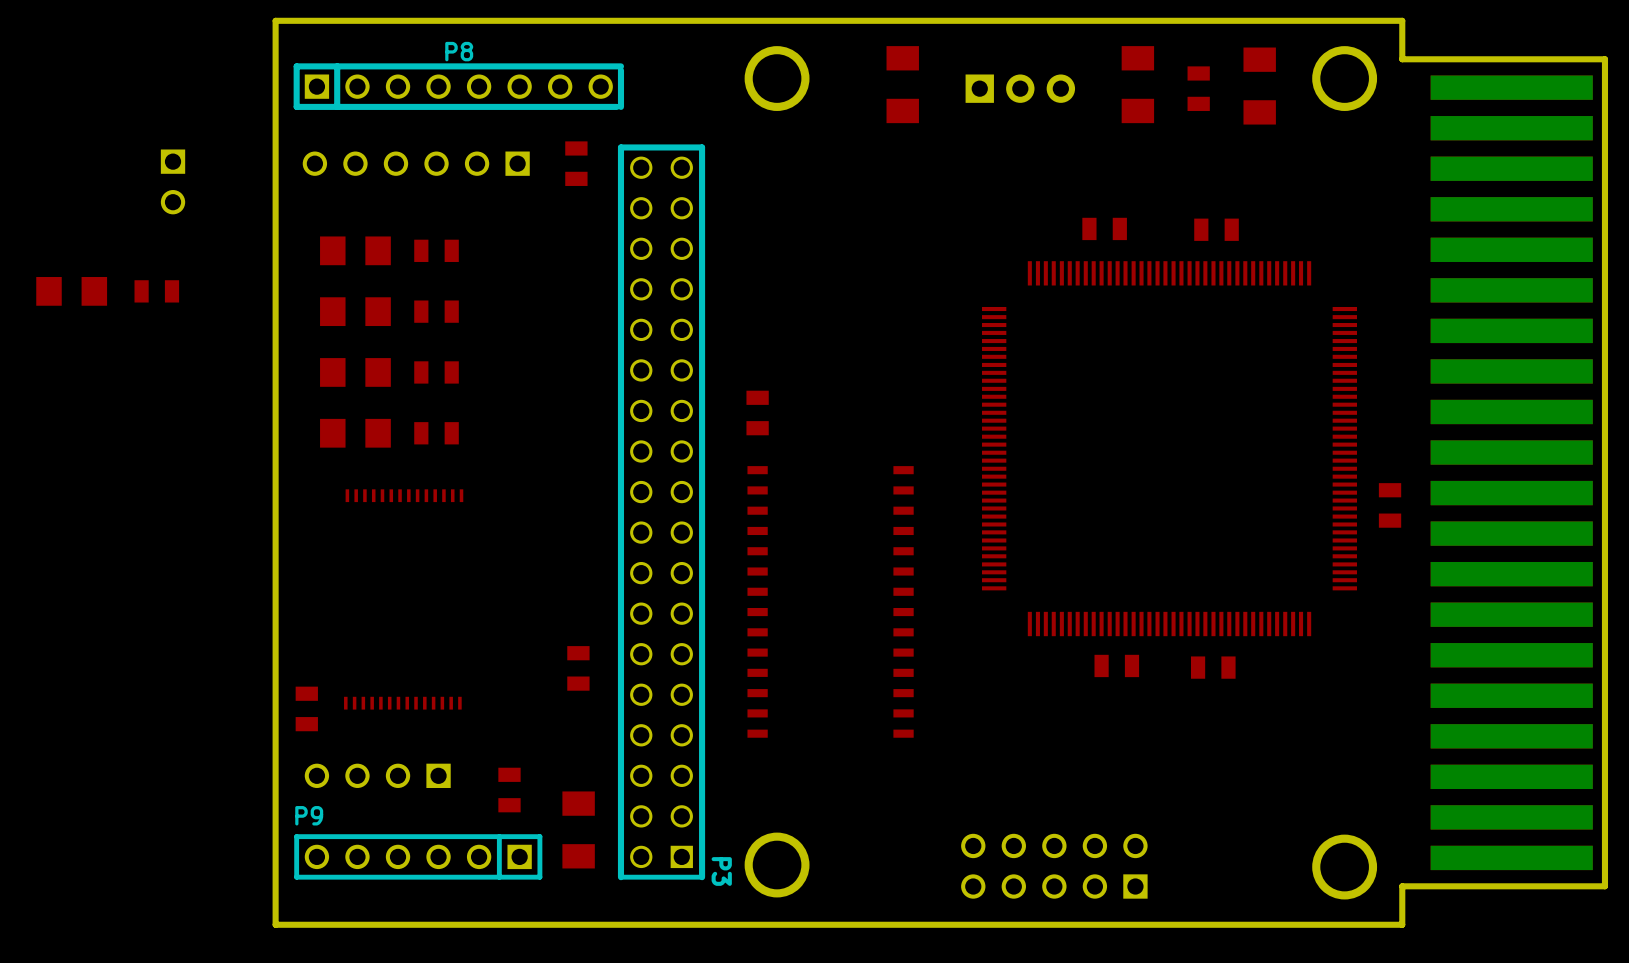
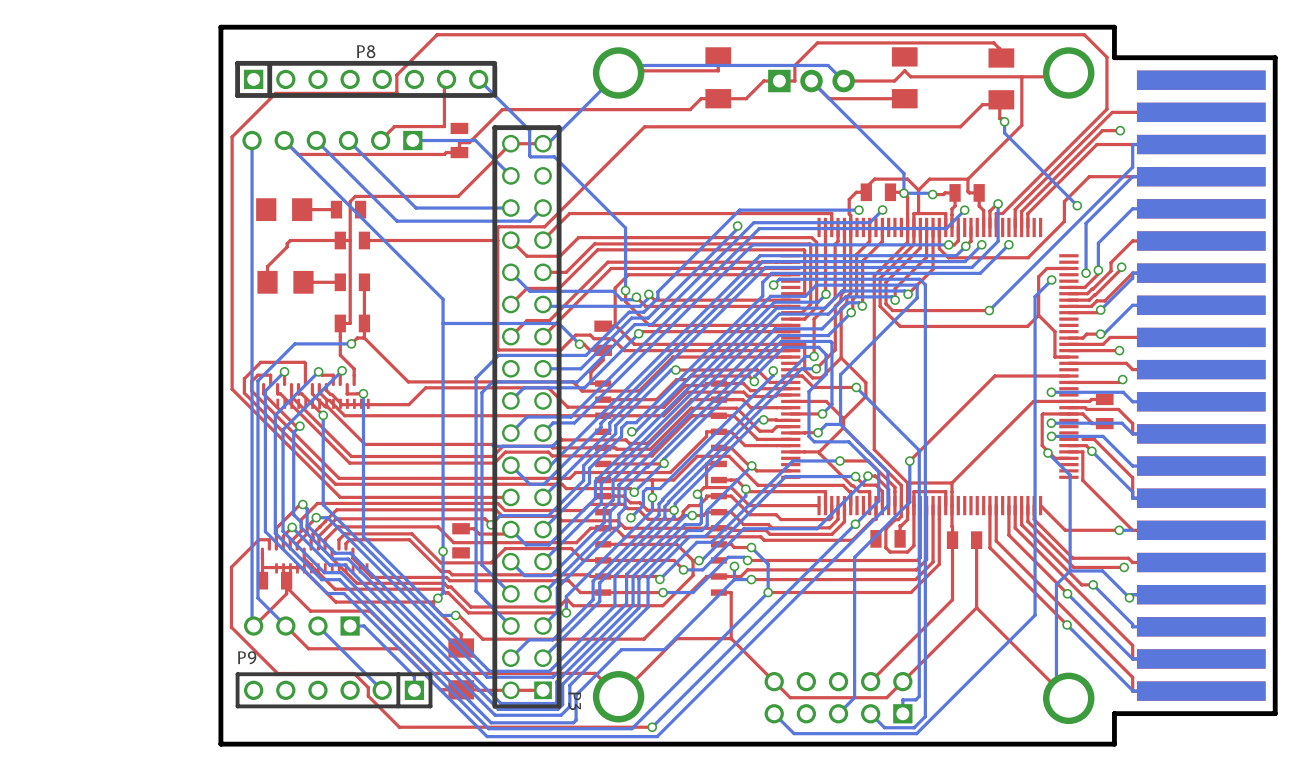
top track: none -> (718, 56) (718, 70) (620, 70) (618, 72)
top track: none -> (999, 62) (999, 48) (993, 42) (817, 42) (794, 65) (794, 81) (763, 81) (746, 98) (701, 98) (690, 109) (502, 109) (469, 142) (459, 142) (459, 152) (446, 152) (444, 154) (298, 154) (284, 140)
top track: none -> (1068, 72) (1064, 76) (910, 76) (904, 70) (894, 81) (843, 81)
top track: none -> (1021, 76) (1021, 125) (967, 179)
top track: none -> (446, 79) (444, 81) (444, 126) (394, 126) (380, 140)
bottom track: none -> (478, 79) (529, 130) (529, 155) (554, 156) (625, 227) (625, 290)
top track: none -> (811, 81) (829, 98) (904, 98)
bottom track: none -> (811, 81) (903, 173) (903, 193) (932, 194)
bottom track: none -> (843, 81) (828, 65) (626, 65) (547, 143) (543, 143)
part: (1198, 88) -> none
top track: none -> (1201, 112) (1112, 112) (1015, 209) (1015, 227)
top track: none -> (1004, 121) (999, 118) (999, 104) (982, 104) (960, 126) (644, 126) (544, 226) (497, 227) (498, 350) (560, 350) (575, 335) (590, 335) (594, 338) (612, 338) (624, 350) (790, 350)
bottom track: none -> (1004, 121) (1004, 133) (1077, 205)
via: none -> (1004, 121)
top track: none -> (1120, 130) (1102, 130) (1021, 211) (1021, 227)
via: none -> (1120, 130)
bottom track: none -> (252, 140) (252, 624) (253, 626)
bottom track: none -> (284, 140) (443, 299) (443, 593) (437, 598)
bottom track: none -> (316, 140) (396, 221) (529, 221) (543, 208)
bottom track: none -> (348, 140) (416, 208) (510, 208)
bottom track: none -> (412, 140) (475, 140) (510, 175)
top track: none -> (543, 143) (510, 143) (458, 196) (355, 196) (350, 201) (350, 323) (340, 323) (340, 355) (354, 369) (354, 384)
top track: none -> (1201, 144) (1096, 144) (1027, 213) (1027, 227)
bottom track: none -> (1201, 144) (1132, 144) (1132, 167) (989, 310)
part: (173, 181) -> none
top track: none -> (1201, 176) (1089, 176) (1064, 201) (1064, 221) (1028, 257) (948, 257) (939, 248) (939, 227)
bottom track: none -> (1201, 176) (1132, 176) (1086, 223) (1086, 273)
top track: none -> (967, 179) (967, 191) (979, 192) (979, 206) (983, 210) (983, 227)
top track: none -> (967, 179) (929, 179) (918, 190)
top track: none -> (918, 190) (907, 179) (874, 179) (861, 192)
top track: none -> (918, 190) (918, 213)
top track: none -> (866, 192) (856, 192) (849, 199) (850, 293) (846, 297) (846, 302) (841, 308) (841, 357)
top track: none -> (890, 192) (900, 192) (907, 196) (907, 242) (874, 275) (874, 449) (907, 482)
via: none -> (903, 193)
top track: none -> (932, 194) (955, 192) (955, 206) (952, 209) (952, 227)
via: none -> (932, 194)
top track: none -> (998, 203) (989, 211) (989, 227)
bottom track: none -> (998, 203) (998, 241) (972, 267) (765, 267) (609, 423) (609, 430) (543, 497)
via: none -> (998, 203)
via: none -> (1077, 205)
bottom track: none -> (1201, 208) (1132, 208) (1098, 243) (1098, 270)
top track: none -> (340, 209) (303, 209)
bottom track: none -> (858, 210) (739, 210) (657, 291) (657, 298) (643, 312) (629, 312) (585, 355) (498, 355) (476, 377) (476, 591) (510, 626)
via: none -> (858, 210)
bottom track: none -> (882, 209) (869, 222) (753, 222) (652, 324) (634, 324) (577, 381) (492, 381) (481, 392) (481, 564) (510, 593)
via: none -> (882, 209)
bottom track: none -> (964, 210) (946, 228) (759, 228) (570, 417) (526, 417) (510, 433)
via: none -> (964, 210)
bottom track: none -> (737, 226) (737, 228) (648, 318) (631, 318) (580, 368) (543, 368)
via: none -> (737, 226)
top track: none -> (825, 227) (826, 294)
top track: none -> (831, 227) (831, 213) (569, 213) (543, 240)
top track: none -> (838, 227) (838, 241) (835, 244) (835, 298) (814, 319) (814, 356)
top track: none -> (844, 227) (844, 291) (841, 294) (841, 300) (835, 306) (835, 349) (816, 368)
top track: none -> (869, 227) (869, 241) (856, 254) (856, 295) (852, 299) (851, 312)
top track: none -> (882, 227) (882, 241) (862, 261) (862, 306)
top track: none -> (920, 227) (920, 247) (886, 282) (886, 303) (892, 310) (989, 310)
top track: none -> (926, 227) (926, 257) (895, 288) (895, 300)
top track: none -> (933, 227) (933, 269) (908, 294)
top track: none -> (945, 227) (945, 213) (913, 213) (913, 244) (880, 278) (880, 306) (900, 326) (1027, 326) (1038, 315)
top track: none -> (958, 227) (958, 240) (954, 244) (948, 244)
top track: none -> (970, 227) (970, 241) (965, 246)
top track: none -> (996, 227) (996, 213) (1002, 213) (1106, 109) (1106, 57) (1084, 34) (437, 34) (396, 75) (395, 93) (275, 93) (232, 136) (232, 389) (340, 497) (510, 497)
top track: none -> (350, 240) (290, 240) (287, 246) (267, 266) (267, 282)
part: none -> (352, 240)
top track: none -> (497, 240) (364, 240)
top track: none -> (510, 240) (526, 256) (559, 256) (578, 237) (811, 237) (816, 242) (816, 307) (804, 319) (790, 319)
top track: none -> (1201, 240) (1132, 240) (1111, 262) (1111, 270) (1087, 293) (1068, 293)
part: (71, 291) -> none
part: (156, 291) -> none
bottom track: none -> (948, 244) (752, 244) (574, 422) (553, 422) (543, 433)
via: none -> (948, 244)
bottom track: none -> (981, 244) (965, 261) (762, 261) (600, 423) (600, 427) (544, 484) (529, 484) (510, 465)
via: none -> (981, 244)
bottom track: none -> (1008, 244) (980, 273) (771, 273) (762, 282) (762, 296) (636, 422) (626, 422) (621, 428) (621, 436) (589, 468) (589, 483) (543, 529)
via: none -> (1008, 244)
bottom track: none -> (965, 246) (956, 255) (760, 255) (550, 465) (543, 465)
via: none -> (965, 246)
part: (355, 311) -> none
part: (436, 311) -> none
top track: none -> (790, 262) (607, 262) (549, 320) (526, 320) (510, 336)
top track: none -> (1121, 267) (1089, 300) (1068, 300)
via: none -> (1121, 267)
top track: none -> (790, 268) (611, 268) (543, 336)
top track: none -> (1068, 268) (1046, 268) (1038, 276) (1038, 315)
top track: none -> (1098, 270) (1098, 273) (1084, 287) (1068, 287)
via: none -> (1098, 270)
bottom track: none -> (510, 272) (529, 291) (613, 291) (621, 299) (633, 299) (636, 297)
top track: none -> (543, 272) (566, 272) (594, 243) (809, 243) (810, 304) (802, 312) (790, 312)
via: none -> (1086, 273)
top track: none -> (1201, 273) (1132, 273) (1104, 300) (1096, 300) (1091, 306) (1068, 306)
bottom track: none -> (1201, 273) (1132, 273) (1132, 278) (1100, 310)
top track: none -> (790, 274) (628, 274) (615, 288) (615, 326)
bottom track: none -> (1051, 280) (1035, 296) (1035, 615) (916, 733) (794, 733) (774, 713)
via: none -> (1051, 280)
part: none -> (285, 282)
top track: none -> (340, 282) (303, 282)
part: none -> (352, 282)
top track: none -> (364, 282) (364, 338)
bottom track: none -> (773, 285) (779, 279) (919, 279) (925, 284) (925, 716) (914, 727) (884, 727) (870, 713)
via: none -> (773, 285)
top track: none -> (625, 290) (625, 301) (649, 325) (790, 325)
via: none -> (625, 290)
top track: none -> (790, 293) (804, 293) (803, 249) (597, 249) (559, 288) (526, 288) (510, 304)
top track: none -> (648, 294) (654, 300) (790, 300)
bottom track: none -> (648, 294) (648, 297) (640, 306) (544, 306) (543, 304)
via: none -> (648, 294)
bottom track: none -> (826, 294) (818, 302) (774, 302) (595, 481) (595, 498) (548, 544) (526, 544) (510, 529)
via: none -> (826, 294)
bottom track: none -> (908, 294) (904, 291) (842, 291) (824, 308) (776, 308) (601, 483) (601, 503) (543, 561)
via: none -> (908, 294)
top track: none -> (636, 297) (645, 306) (790, 306)
via: none -> (636, 297)
bottom track: none -> (895, 300) (891, 296) (845, 296) (828, 314) (779, 314) (613, 480) (613, 500) (604, 508) (604, 522) (551, 575) (524, 575) (510, 561)
via: none -> (895, 300)
bottom track: none -> (1201, 305) (1132, 305) (1103, 334) (1100, 334)
part: (355, 372) -> none
part: (436, 372) -> none
bottom track: none -> (862, 306) (859, 302) (848, 302) (822, 328) (775, 328) (618, 485) (618, 503) (610, 511) (610, 526) (543, 593)
via: none -> (862, 306)
top track: none -> (1100, 310) (1098, 312) (1068, 312)
via: none -> (1100, 310)
via: none -> (989, 310)
bottom track: none -> (851, 312) (828, 335) (779, 335) (647, 466)
via: none -> (851, 312)
top track: none -> (1038, 315) (1054, 331) (1054, 357) (1068, 357)
part: none -> (352, 323)
bottom track: none -> (443, 323) (558, 323) (579, 344)
top track: none -> (603, 326) (616, 326) (634, 344) (804, 344) (804, 370) (812, 377) (821, 377) (841, 357)
top track: none -> (790, 331) (640, 331) (638, 333)
bottom track: none -> (638, 333) (584, 387) (524, 387) (510, 400)
via: none -> (638, 333)
top track: none -> (1100, 334) (1086, 334) (1082, 338) (1068, 338)
via: none -> (1100, 334)
top track: none -> (1201, 337) (1110, 337) (1103, 344) (1068, 344)
top track: none -> (364, 338) (357, 338) (351, 343)
top track: none -> (364, 338) (408, 381) (573, 381) (582, 391) (639, 391) (673, 357) (790, 357)
bottom track: none -> (351, 343) (294, 343) (257, 380) (257, 598) (285, 626)
via: none -> (351, 343)
top track: none -> (579, 344) (583, 344) (590, 350) (603, 350) (603, 360) (590, 372) (590, 383) (603, 383)
via: none -> (579, 344)
top track: none -> (1119, 350) (1068, 350)
via: none -> (1119, 350)
part: (355, 433) -> none
part: (436, 433) -> none
bottom track: none -> (814, 356) (805, 356) (662, 499) (659, 504) (659, 515) (593, 581) (593, 599) (552, 639) (529, 639) (510, 658)
via: none -> (814, 356)
top track: none -> (841, 357) (865, 382) (865, 396) (843, 418)
top track: none -> (1068, 363) (1126, 363) (1132, 369) (1201, 369)
bottom track: none -> (816, 368) (801, 368) (668, 501) (664, 506) (664, 517) (599, 582) (599, 601) (543, 658)
via: none -> (816, 368)
top track: none -> (342, 370) (340, 372) (340, 384)
bottom track: none -> (342, 370) (283, 429) (283, 531) (324, 572) (341, 572) (491, 722) (573, 722) (576, 720) (576, 695) (621, 649) (664, 649) (734, 579)
via: none -> (342, 370)
top track: none -> (675, 370) (757, 370) (769, 382) (790, 382)
bottom track: none -> (675, 370) (671, 370) (615, 425) (615, 433) (583, 465) (583, 480) (548, 515) (500, 515) (491, 524)
via: none -> (675, 370)
bottom track: none -> (773, 370) (773, 375) (660, 488) (646, 488) (643, 492) (643, 505) (630, 517)
via: none -> (773, 370)
top track: none -> (284, 371) (284, 384)
bottom track: none -> (284, 371) (265, 390) (265, 531) (327, 593) (344, 593) (487, 736) (657, 736) (887, 505) (887, 471) (840, 424)
via: none -> (284, 371)
top track: none -> (318, 371) (321, 375) (333, 375) (333, 384)
bottom track: none -> (318, 371) (275, 415) (275, 533) (321, 579) (339, 579) (488, 728) (631, 728) (768, 592) (768, 564) (751, 547)
via: none -> (318, 371)
top track: none -> (790, 376) (802, 376) (813, 387) (856, 387)
top track: none -> (1068, 376) (994, 376) (909, 461)
top track: none -> (1122, 379) (1119, 382) (1068, 382)
via: none -> (1122, 379)
top track: none -> (754, 381) (748, 376) (690, 376) (687, 379) (676, 379) (656, 399) (603, 399)
bottom track: none -> (754, 381) (754, 376) (783, 347) (818, 347) (826, 354) (826, 374) (809, 391) (809, 436) (814, 441) (848, 441) (878, 471) (878, 500) (855, 524)
via: none -> (754, 381)
top track: none -> (263, 384) (263, 393) (295, 426) (299, 426)
top track: none -> (270, 384) (270, 375) (257, 375) (251, 381) (251, 390) (339, 478) (569, 478) (575, 472) (670, 472) (706, 436) (706, 431) (731, 431) (745, 445) (790, 445)
top track: none -> (277, 384) (277, 393) (280, 393) (349, 463) (494, 463) (505, 452) (548, 452) (552, 455) (651, 455) (692, 415) (733, 415) (757, 439) (790, 439)
top track: none -> (291, 384) (291, 396) (351, 456) (492, 456) (503, 446) (650, 449) (691, 408) (736, 408) (759, 431) (772, 431) (776, 426) (790, 426)
top track: none -> (298, 384) (298, 393) (301, 393) (323, 415)
top track: none -> (305, 384) (304, 362) (260, 362) (244, 378) (244, 393) (335, 484) (561, 484) (566, 488) (630, 488) (634, 492)
top track: none -> (312, 384) (312, 393) (365, 444) (491, 444)
top track: none -> (319, 384) (319, 392) (344, 415) (663, 415) (687, 392) (743, 392) (748, 396) (790, 394)
top track: none -> (326, 384) (326, 390) (342, 404) (408, 404) (425, 387) (548, 387) (567, 407) (663, 407) (685, 385) (704, 385) (706, 383) (743, 383) (750, 390) (790, 388)
top track: none -> (347, 384) (347, 393) (363, 393)
bottom track: none -> (856, 387) (919, 450) (919, 696) (915, 699) (902, 699) (902, 713)
via: none -> (856, 387)
bottom track: none -> (1051, 392) (1123, 392) (1132, 401) (1201, 401)
via: none -> (1051, 392)
bottom track: none -> (363, 393) (363, 536) (442, 615) (455, 615)
via: none -> (363, 393)
top track: none -> (1104, 399) (1091, 399) (1089, 401) (1033, 401) (952, 482)
top track: none -> (790, 401) (826, 401) (843, 418)
top track: none -> (790, 407) (750, 407) (742, 399) (691, 399) (647, 443) (629, 443) (625, 439) (560, 438)
top track: none -> (1068, 407) (1118, 409) (1132, 423) (1132, 433) (1201, 433)
top track: none -> (822, 413) (790, 413)
bottom track: none -> (822, 413) (831, 404) (831, 342) (781, 341) (663, 459) (663, 462)
via: none -> (822, 413)
bottom track: none -> (323, 415) (323, 504) (489, 671) (549, 671) (614, 605) (614, 576) (674, 516) (675, 503) (758, 419) (763, 419)
via: none -> (323, 415)
top track: none -> (843, 418) (843, 427)
top track: none -> (763, 419) (790, 420)
via: none -> (763, 419)
bottom track: none -> (1051, 423) (1121, 423) (1132, 433) (1201, 433)
via: none -> (1051, 423)
top track: none -> (1104, 423) (1091, 423) (1082, 413) (1043, 413) (1042, 445) (1054, 458) (1068, 458)
bottom track: none -> (840, 424) (840, 374) (917, 298) (916, 285) (816, 285) (805, 296) (770, 296) (635, 431) (631, 431)
bottom track: none -> (840, 424) (826, 424) (818, 432)
bottom track: none -> (299, 426) (293, 432) (293, 514) (301, 522) (301, 527) (332, 559) (348, 559) (498, 709) (557, 709) (562, 704) (562, 684) (638, 607) (638, 578) (687, 530) (701, 530) (707, 525) (707, 510) (751, 465)
via: none -> (299, 426)
top track: none -> (843, 427) (901, 485) (901, 516) (885, 528) (885, 547) (890, 552) (907, 552) (913, 545) (913, 491) (945, 491) (945, 505)
top track: none -> (843, 427) (819, 451)
via: none -> (631, 431)
top track: none -> (818, 432) (790, 432)
via: none -> (818, 432)
bottom track: none -> (1051, 436) (1103, 436) (1132, 466) (1201, 466)
via: none -> (1051, 436)
bottom track: none -> (560, 438) (552, 446) (493, 446) (491, 444)
top track: none -> (1082, 439) (1094, 439) (1132, 477) (1132, 498) (1201, 498)
top track: none -> (1068, 445) (1086, 445) (1091, 451)
top track: none -> (718, 447) (731, 447) (756, 470) (790, 470)
bottom track: none -> (1091, 451) (1132, 492) (1132, 498) (1201, 498)
via: none -> (1091, 451)
top track: none -> (819, 451) (859, 491) (869, 491) (869, 505)
top track: none -> (819, 451) (790, 451)
top track: none -> (1068, 451) (1082, 451) (1082, 480) (1132, 530) (1201, 530)
bottom track: none -> (1047, 453) (1070, 475) (1070, 570)
via: none -> (1047, 453)
top track: none -> (839, 460) (868, 460) (894, 487) (894, 505)
bottom track: none -> (839, 460) (792, 460) (711, 542) (697, 542) (659, 579)
via: none -> (839, 460)
bottom track: none -> (909, 461) (909, 502) (854, 557) (854, 697) (838, 713)
via: none -> (909, 461)
bottom track: none -> (663, 462) (634, 492)
top track: none -> (664, 463) (603, 463)
via: none -> (664, 463)
top track: none -> (718, 463) (706, 463) (706, 487)
via: none -> (751, 465)
bottom track: none -> (647, 466) (625, 488) (625, 508) (618, 514) (618, 526) (557, 588) (557, 611) (543, 626)
top track: none -> (867, 476) (875, 476) (888, 489) (888, 505)
bottom track: none -> (867, 476) (817, 528) (743, 528) (702, 569) (683, 569)
via: none -> (867, 476)
top track: none -> (855, 476) (864, 485) (876, 485) (882, 491) (882, 505)
bottom track: none -> (855, 476) (785, 476) (701, 560) (699, 560)
via: none -> (855, 476)
top track: none -> (603, 480) (673, 480) (697, 456) (728, 456) (758, 485) (843, 485) (850, 491) (850, 505)
top track: none -> (652, 480) (652, 497)
top track: none -> (718, 480) (736, 480) (748, 491) (825, 491) (825, 505)
top track: none -> (907, 482) (907, 519) (900, 525) (900, 538)
top track: none -> (952, 482) (952, 599) (870, 681)
top track: none -> (952, 482) (907, 482)
bottom track: none -> (745, 489) (745, 495) (705, 536) (689, 536) (648, 578) (648, 607) (569, 685) (569, 706) (561, 715) (495, 715) (344, 564) (329, 564) (292, 527)
via: none -> (745, 489)
via: none -> (634, 492)
top track: none -> (697, 494) (704, 487) (731, 487) (749, 505) (819, 505)
bottom track: none -> (697, 494) (701, 498) (701, 522) (699, 524) (684, 524) (633, 576) (633, 605) (556, 681) (555, 703) (500, 703) (350, 553) (335, 553) (307, 525) (307, 508) (302, 504)
via: none -> (697, 494)
top track: none -> (603, 496) (623, 496) (630, 502) (640, 502) (647, 510) (674, 510)
bottom track: none -> (652, 497) (652, 510) (566, 596) (566, 612)
via: none -> (652, 497)
top track: none -> (302, 504) (300, 504) (276, 528) (276, 549)
via: none -> (302, 504)
top track: none -> (831, 505) (831, 517) (829, 519) (780, 519) (776, 514) (749, 514) (731, 496) (706, 496) (698, 505) (689, 505) (678, 519) (648, 519) (637, 508) (627, 508) (623, 504) (589, 504) (583, 510) (504, 510) (497, 503) (317, 503) (301, 519) (301, 531) (290, 539) (290, 549)
top track: none -> (838, 505) (838, 519) (829, 527) (771, 527) (768, 524) (743, 524) (731, 512) (706, 512) (703, 515) (692, 515)
top track: none -> (844, 505) (844, 521) (831, 534) (769, 534) (766, 530) (733, 530) (731, 528) (625, 528) (617, 520) (561, 520) (557, 516) (502, 516) (495, 509) (336, 509) (325, 521)
top track: none -> (875, 505) (875, 519) (873, 519) (852, 540) (764, 540) (760, 536) (624, 536) (615, 528) (590, 528) (576, 542) (453, 542) (437, 526) (337, 526) (325, 539) (325, 549)
top track: none -> (920, 505) (920, 557) (917, 560) (747, 560)
top track: none -> (926, 505) (926, 559) (916, 569) (747, 569) (740, 576) (706, 576) (643, 639) (482, 639) (458, 615) (455, 615)
top track: none -> (933, 505) (933, 562) (915, 579) (751, 579)
top track: none -> (939, 505) (939, 564) (911, 592) (768, 592)
top track: none -> (989, 505) (989, 547) (1067, 624)
top track: none -> (996, 505) (996, 540) (1132, 677) (1132, 691) (1201, 691)
top track: none -> (1008, 505) (1008, 535) (1067, 593)
top track: none -> (1015, 505) (1015, 528) (1132, 645) (1132, 658) (1201, 658)
top track: none -> (1021, 505) (1021, 524) (1081, 584) (1093, 584)
top track: none -> (1027, 505) (1027, 521) (1073, 567) (1124, 567)
top track: none -> (1034, 505) (1034, 519) (1072, 558) (1128, 558) (1132, 562) (1201, 562)
top track: none -> (1040, 505) (1065, 530) (1119, 530)
via: none -> (674, 510)
bottom track: none -> (692, 515) (685, 515) (626, 574) (626, 603) (553, 677) (487, 677) (327, 517) (316, 517)
via: none -> (692, 515)
top track: none -> (316, 517) (307, 526) (307, 533) (297, 543) (297, 549)
via: none -> (316, 517)
via: none -> (630, 517)
top track: none -> (325, 521) (320, 526)
bottom track: none -> (855, 524) (652, 727)
via: none -> (855, 524)
top track: none -> (491, 524) (485, 518) (336, 518) (318, 536)
via: none -> (491, 524)
top track: none -> (319, 526) (313, 533) (311, 549)
top track: none -> (292, 527) (283, 536) (283, 549)
via: none -> (292, 527)
top track: none -> (461, 528) (474, 528) (479, 534) (506, 534) (510, 529)
via: none -> (1119, 530)
bottom track: none -> (1132, 530) (1119, 530)
top track: none -> (318, 536) (318, 549)
top track: none -> (976, 540) (976, 607)
top track: none -> (603, 544) (676, 544) (693, 560)
top track: none -> (718, 544) (731, 544) (734, 547) (751, 547)
via: none -> (751, 547)
top track: none -> (262, 549) (262, 558)
top track: none -> (269, 549) (269, 539) (258, 539) (231, 567) (231, 627) (277, 673) (354, 673) (368, 687) (368, 696) (399, 727) (652, 727)
top track: none -> (304, 549) (304, 558) (334, 589) (441, 589) (448, 592) (468, 612) (566, 612)
top track: none -> (332, 549) (332, 558) (356, 583) (444, 583) (450, 587) (470, 607) (558, 607) (566, 599) (573, 605) (662, 605) (693, 575) (693, 560)
top track: none -> (338, 549) (338, 539) (344, 533) (411, 533) (440, 562) (491, 562) (505, 548) (571, 548) (583, 560) (674, 560) (683, 569)
top track: none -> (345, 549) (345, 543) (349, 539) (409, 539) (441, 571) (448, 571) (452, 574) (589, 574) (590, 576) (656, 576) (659, 579)
top track: none -> (352, 549) (352, 558) (371, 577) (446, 577) (449, 580) (568, 580) (580, 592) (663, 592)
via: none -> (443, 551)
top track: none -> (262, 558) (262, 580)
via: none -> (699, 560)
bottom track: none -> (747, 560) (744, 557) (728, 557) (693, 592) (663, 592)
via: none -> (747, 560)
bottom track: none -> (734, 566) (734, 579)
via: none -> (734, 566)
via: none -> (1124, 567)
top track: none -> (262, 567) (301, 567) (335, 602) (433, 602)
via: none -> (683, 569)
bottom track: none -> (1070, 570) (1056, 584) (1056, 686) (1068, 698)
bottom track: none -> (1070, 570) (1102, 570) (1129, 597) (1132, 594) (1201, 594)
part rotation: 0° (306, 708) -> 90° clockwise (274, 580)
part position: (306, 708) -> (274, 580)
via: none -> (659, 579)
bottom track: none -> (751, 579) (734, 579)
via: none -> (751, 579)
top track: none -> (286, 580) (286, 593) (253, 626)
bottom track: none -> (1093, 584) (1132, 624) (1132, 626) (1201, 626)
via: none -> (1093, 584)
top track: none -> (286, 587) (310, 611) (370, 611) (432, 673) (595, 673) (618, 696) (676, 638) (731, 638)
via: none -> (663, 592)
top track: none -> (718, 592) (731, 592) (731, 638)
via: none -> (768, 592)
bottom track: none -> (1067, 593) (1132, 658) (1201, 658)
via: none -> (1067, 593)
via: none -> (437, 598)
via: none -> (1129, 597)
top track: none -> (433, 602) (433, 606) (461, 634) (461, 648)
top track: none -> (976, 607) (886, 697) (790, 697) (731, 638)
top track: none -> (976, 607) (1068, 698)
via: none -> (566, 612)
via: none -> (455, 615)
bottom track: none -> (1067, 624) (1132, 691) (1201, 691)
via: none -> (1067, 624)
top track: none -> (285, 626) (308, 648) (399, 648) (440, 689) (543, 690)
bottom track: none -> (317, 626) (382, 690)
bottom track: none -> (350, 626) (364, 626) (414, 676) (414, 690)
part: (509, 790) -> none
via: none -> (652, 727)

